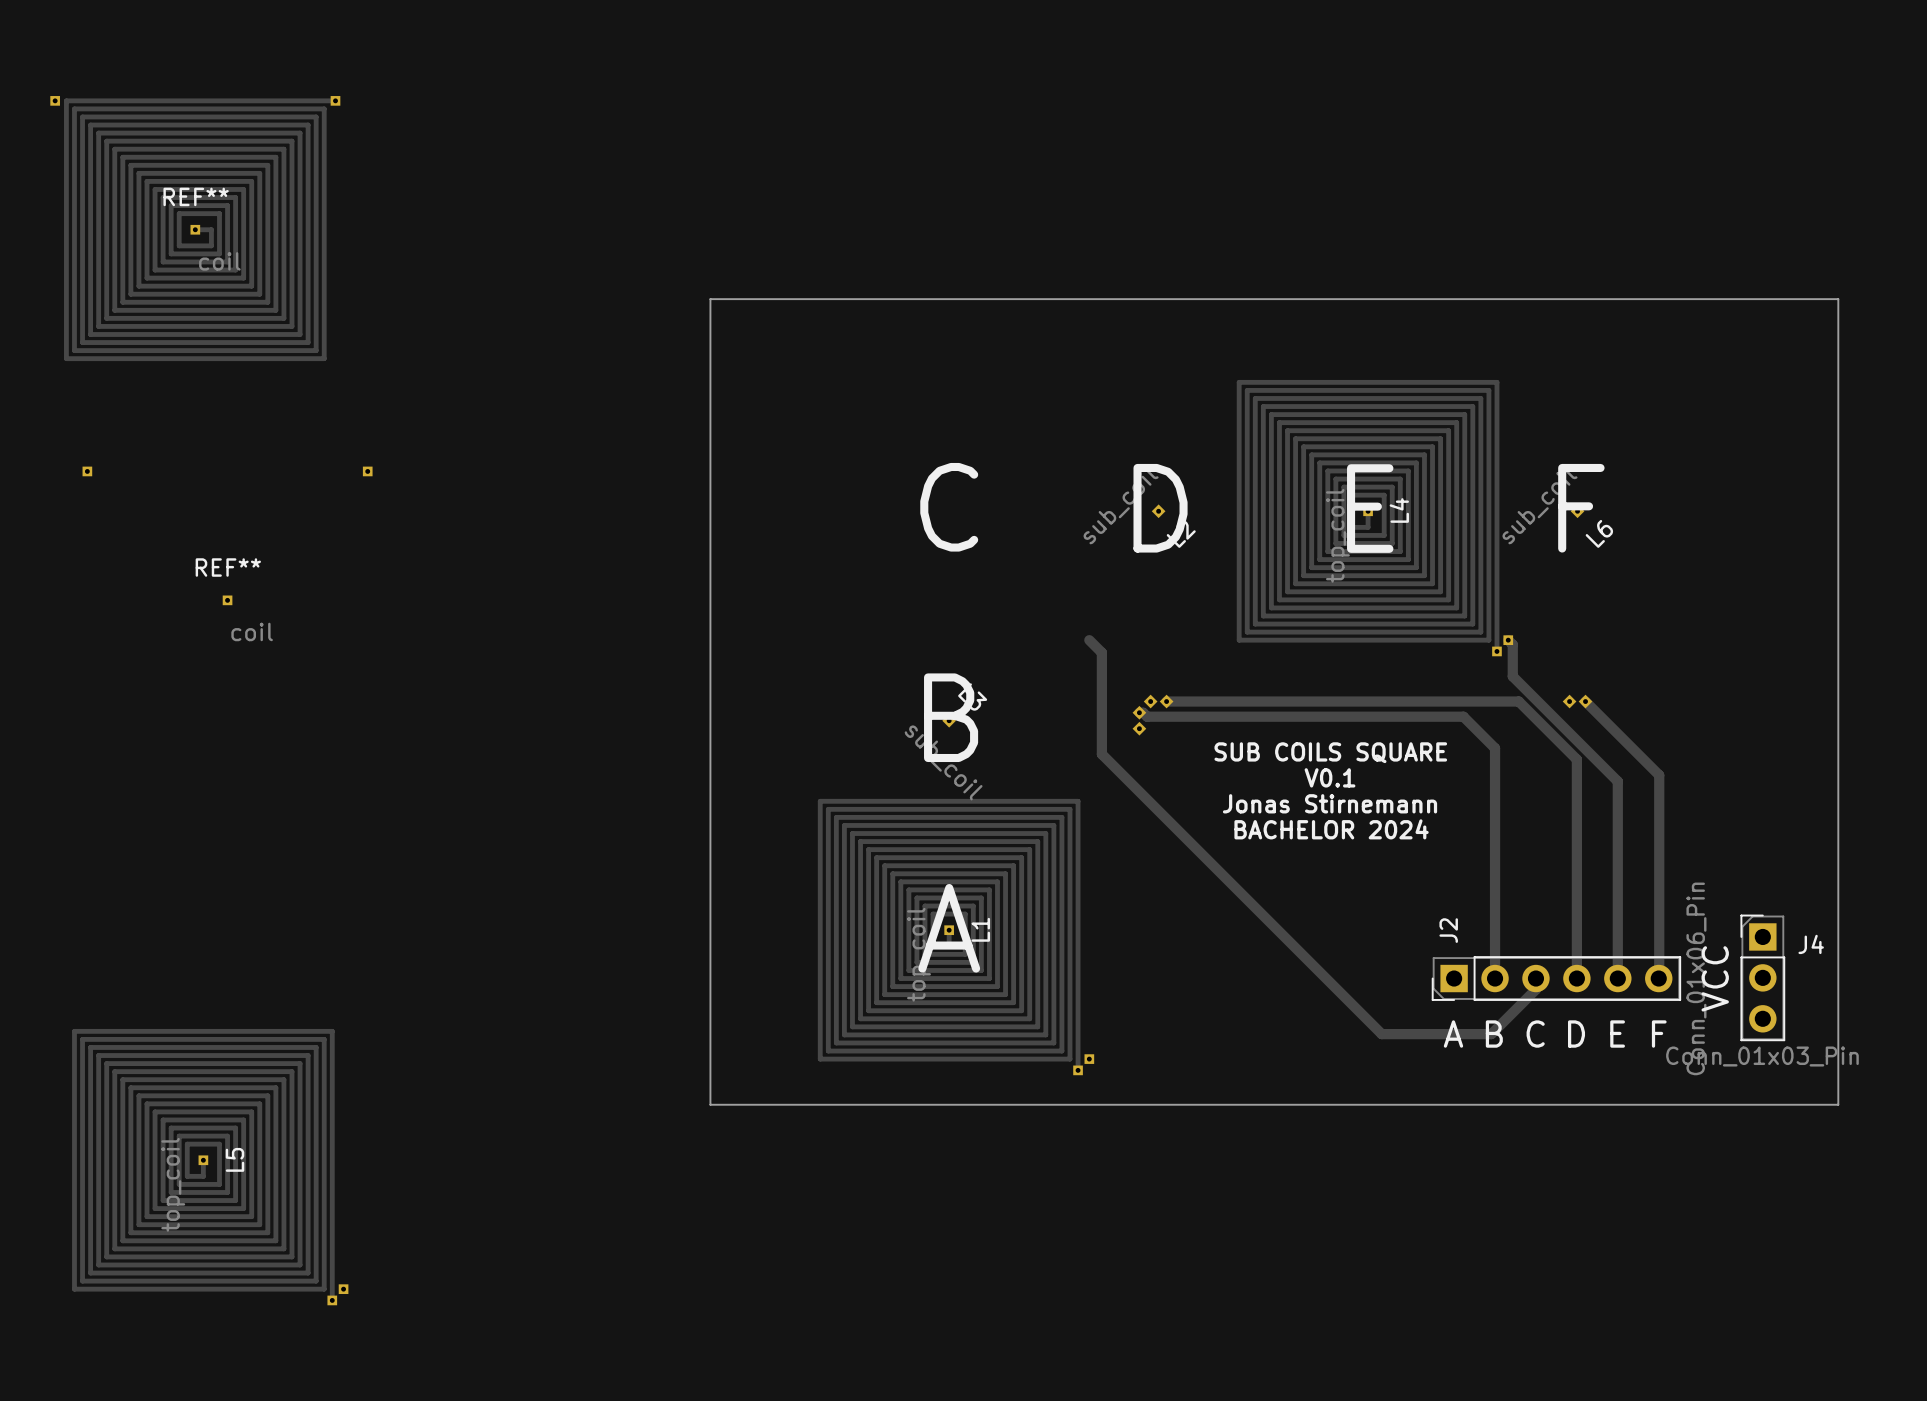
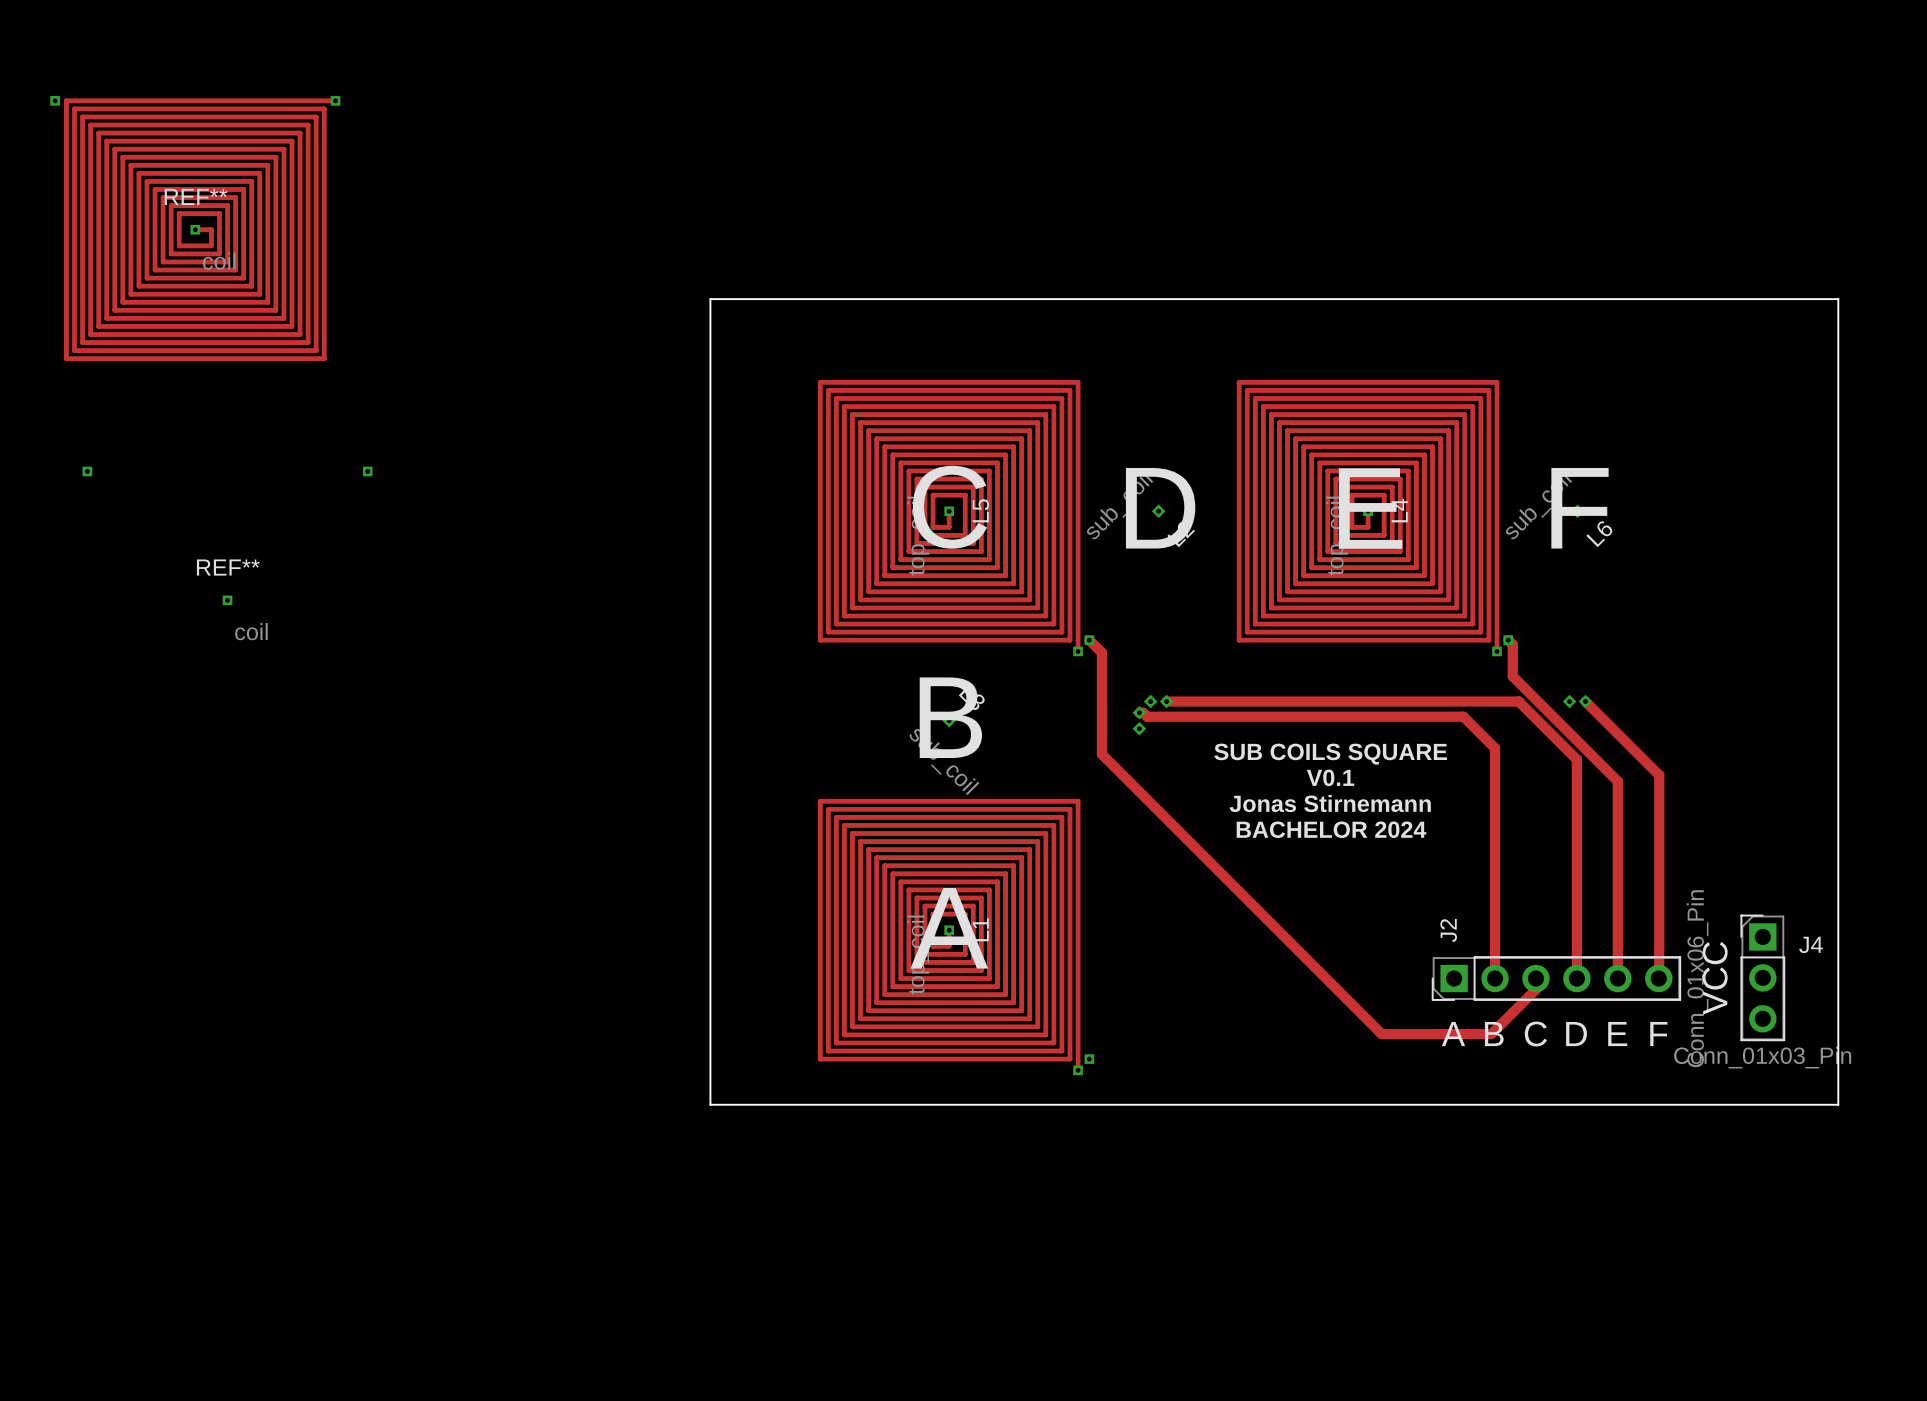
L5 position: (210, 1167) -> (956, 518)

